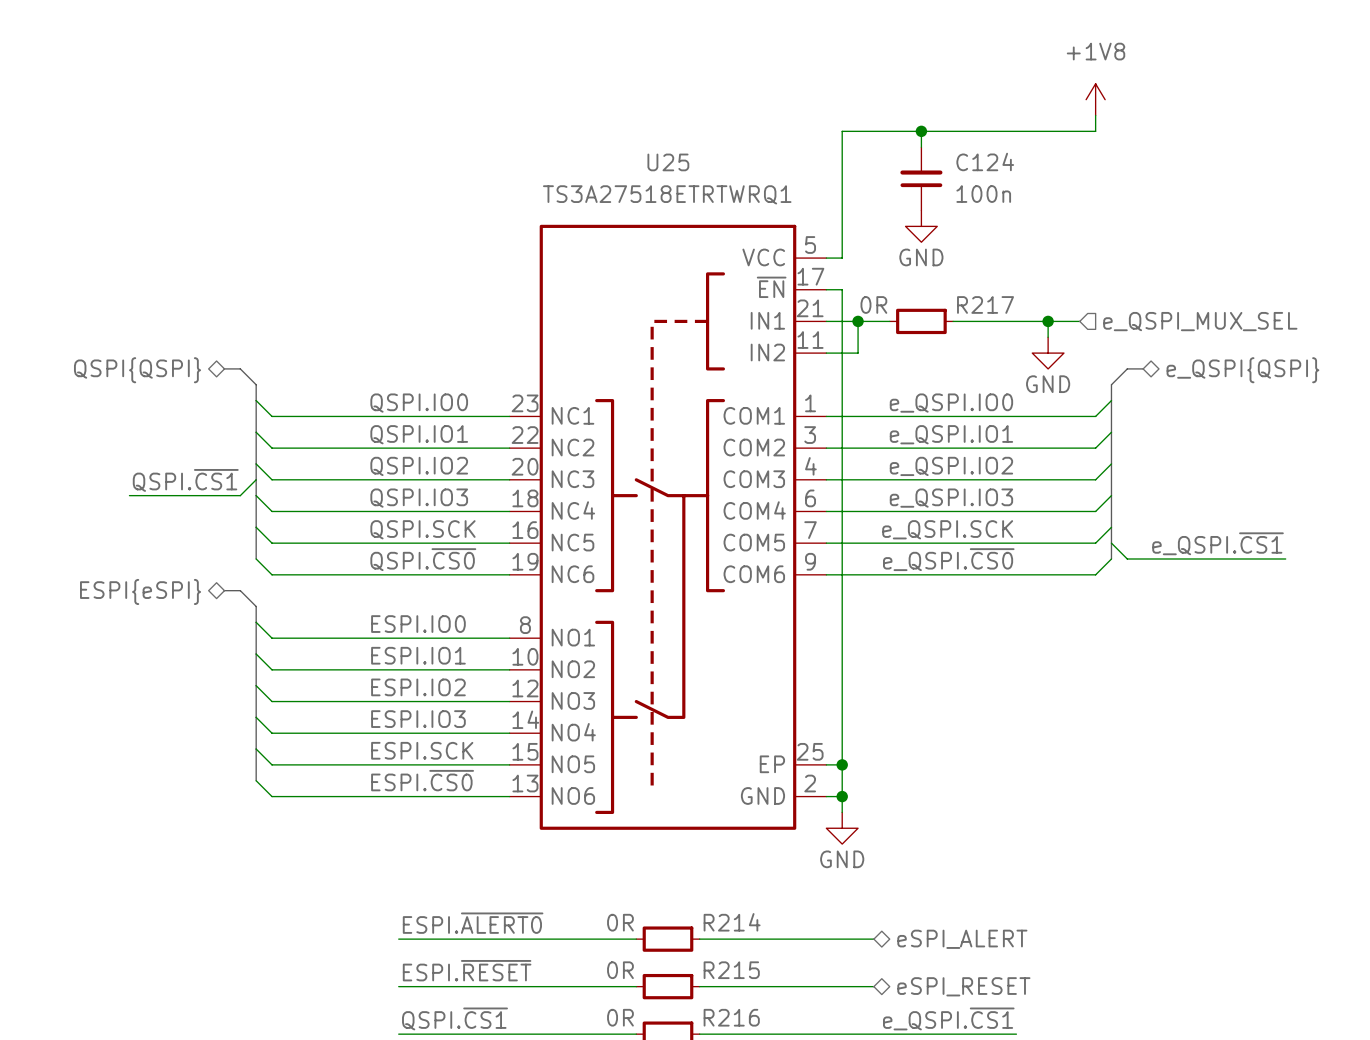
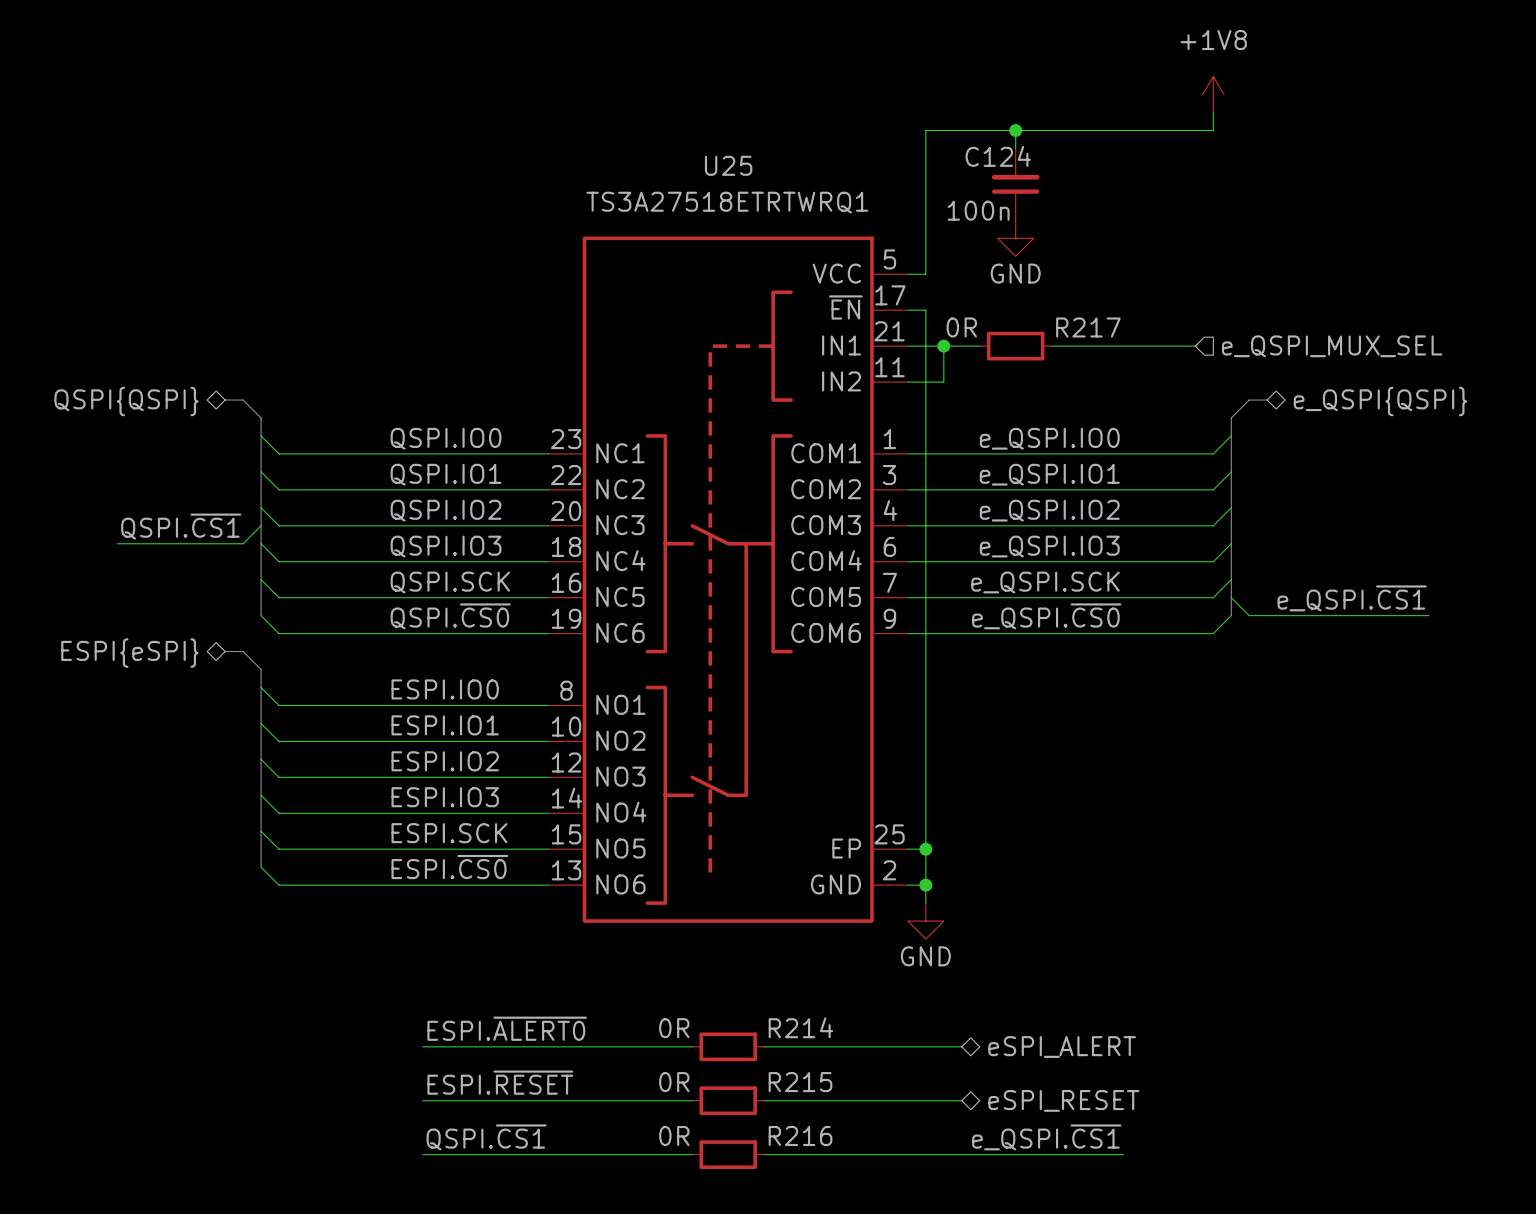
C124 name position: C124 (985, 161) -> C124 (998, 156)
C124 text position: 100n (983, 194) -> 100n (978, 210)
wire: (1048, 321) (1048, 337) -> none
junction: (1048, 321) -> none
power symbol: GND (1048, 353) -> none

